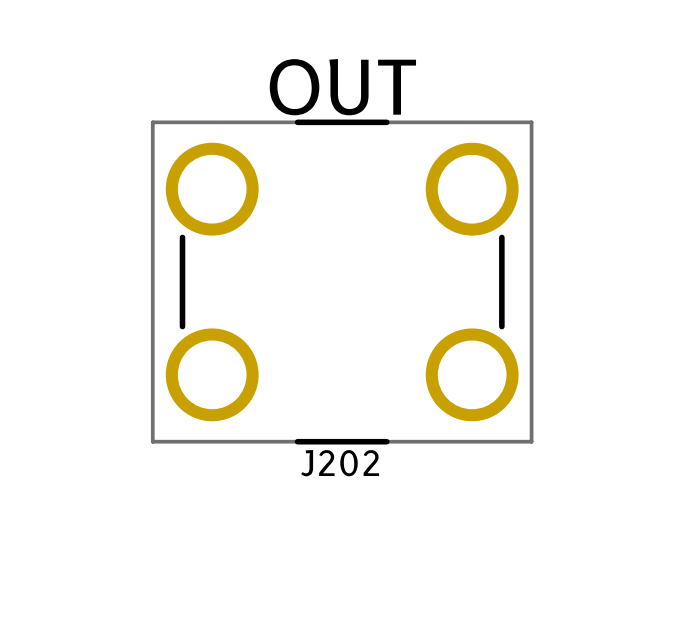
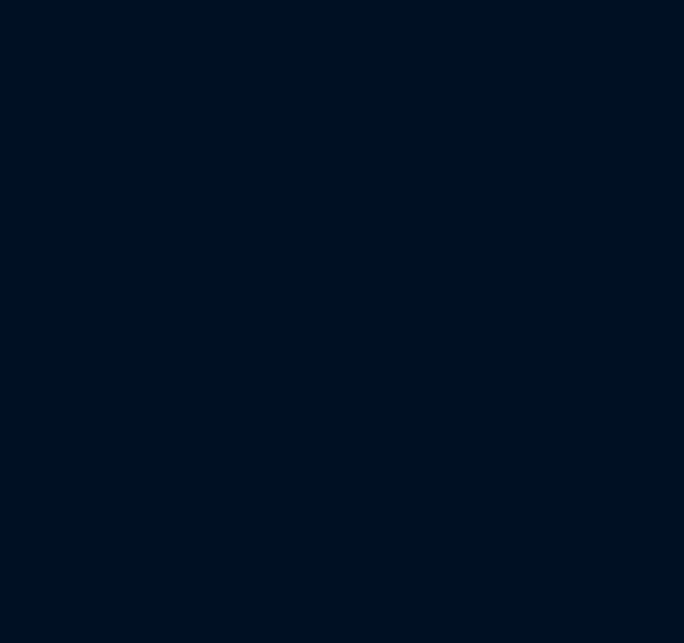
J202: OUT (342, 282) -> none

